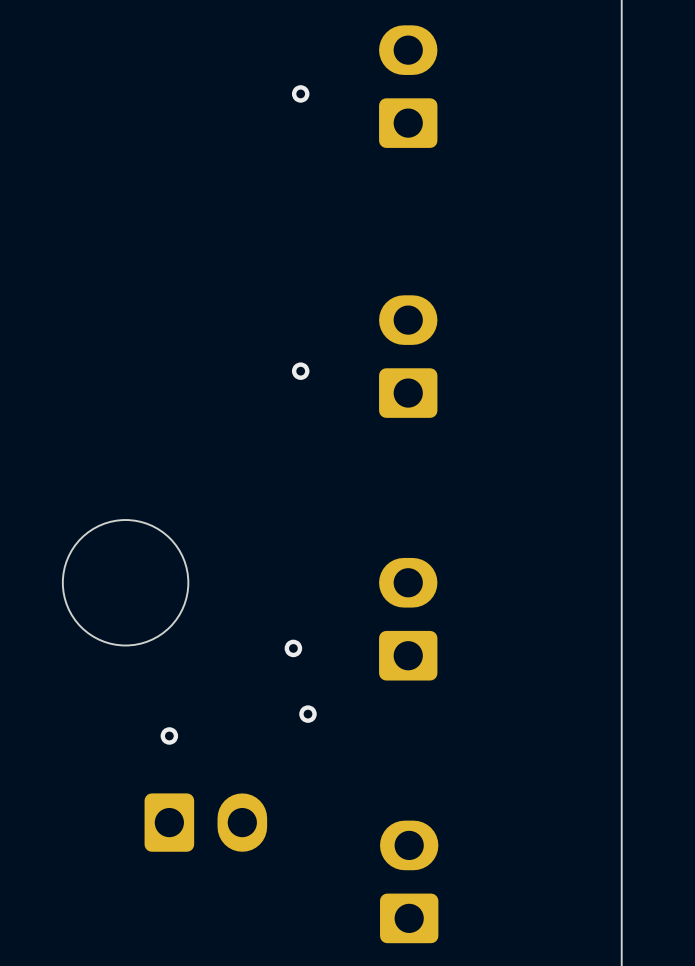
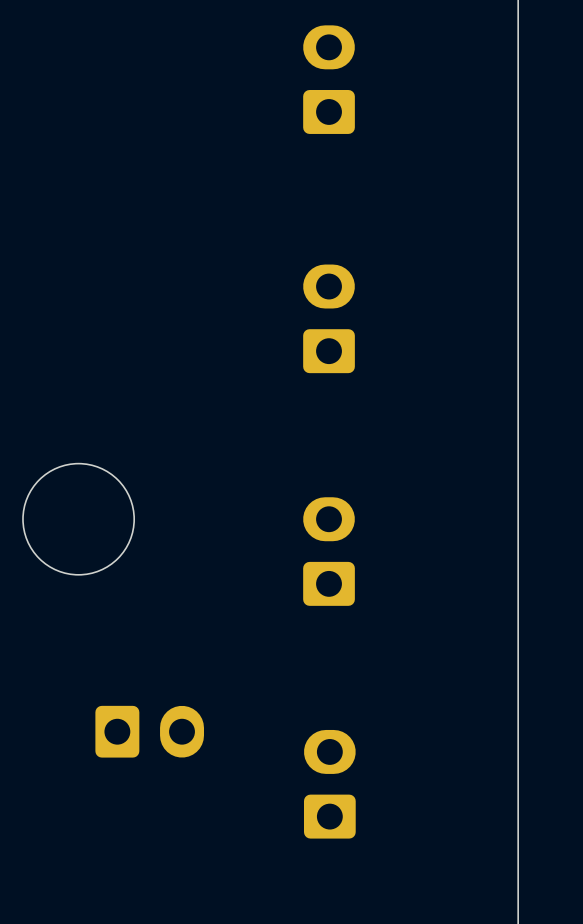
via: (300, 93) -> none
via: (300, 371) -> none
via: (293, 648) -> none
via: (307, 714) -> none
via: (169, 735) -> none

